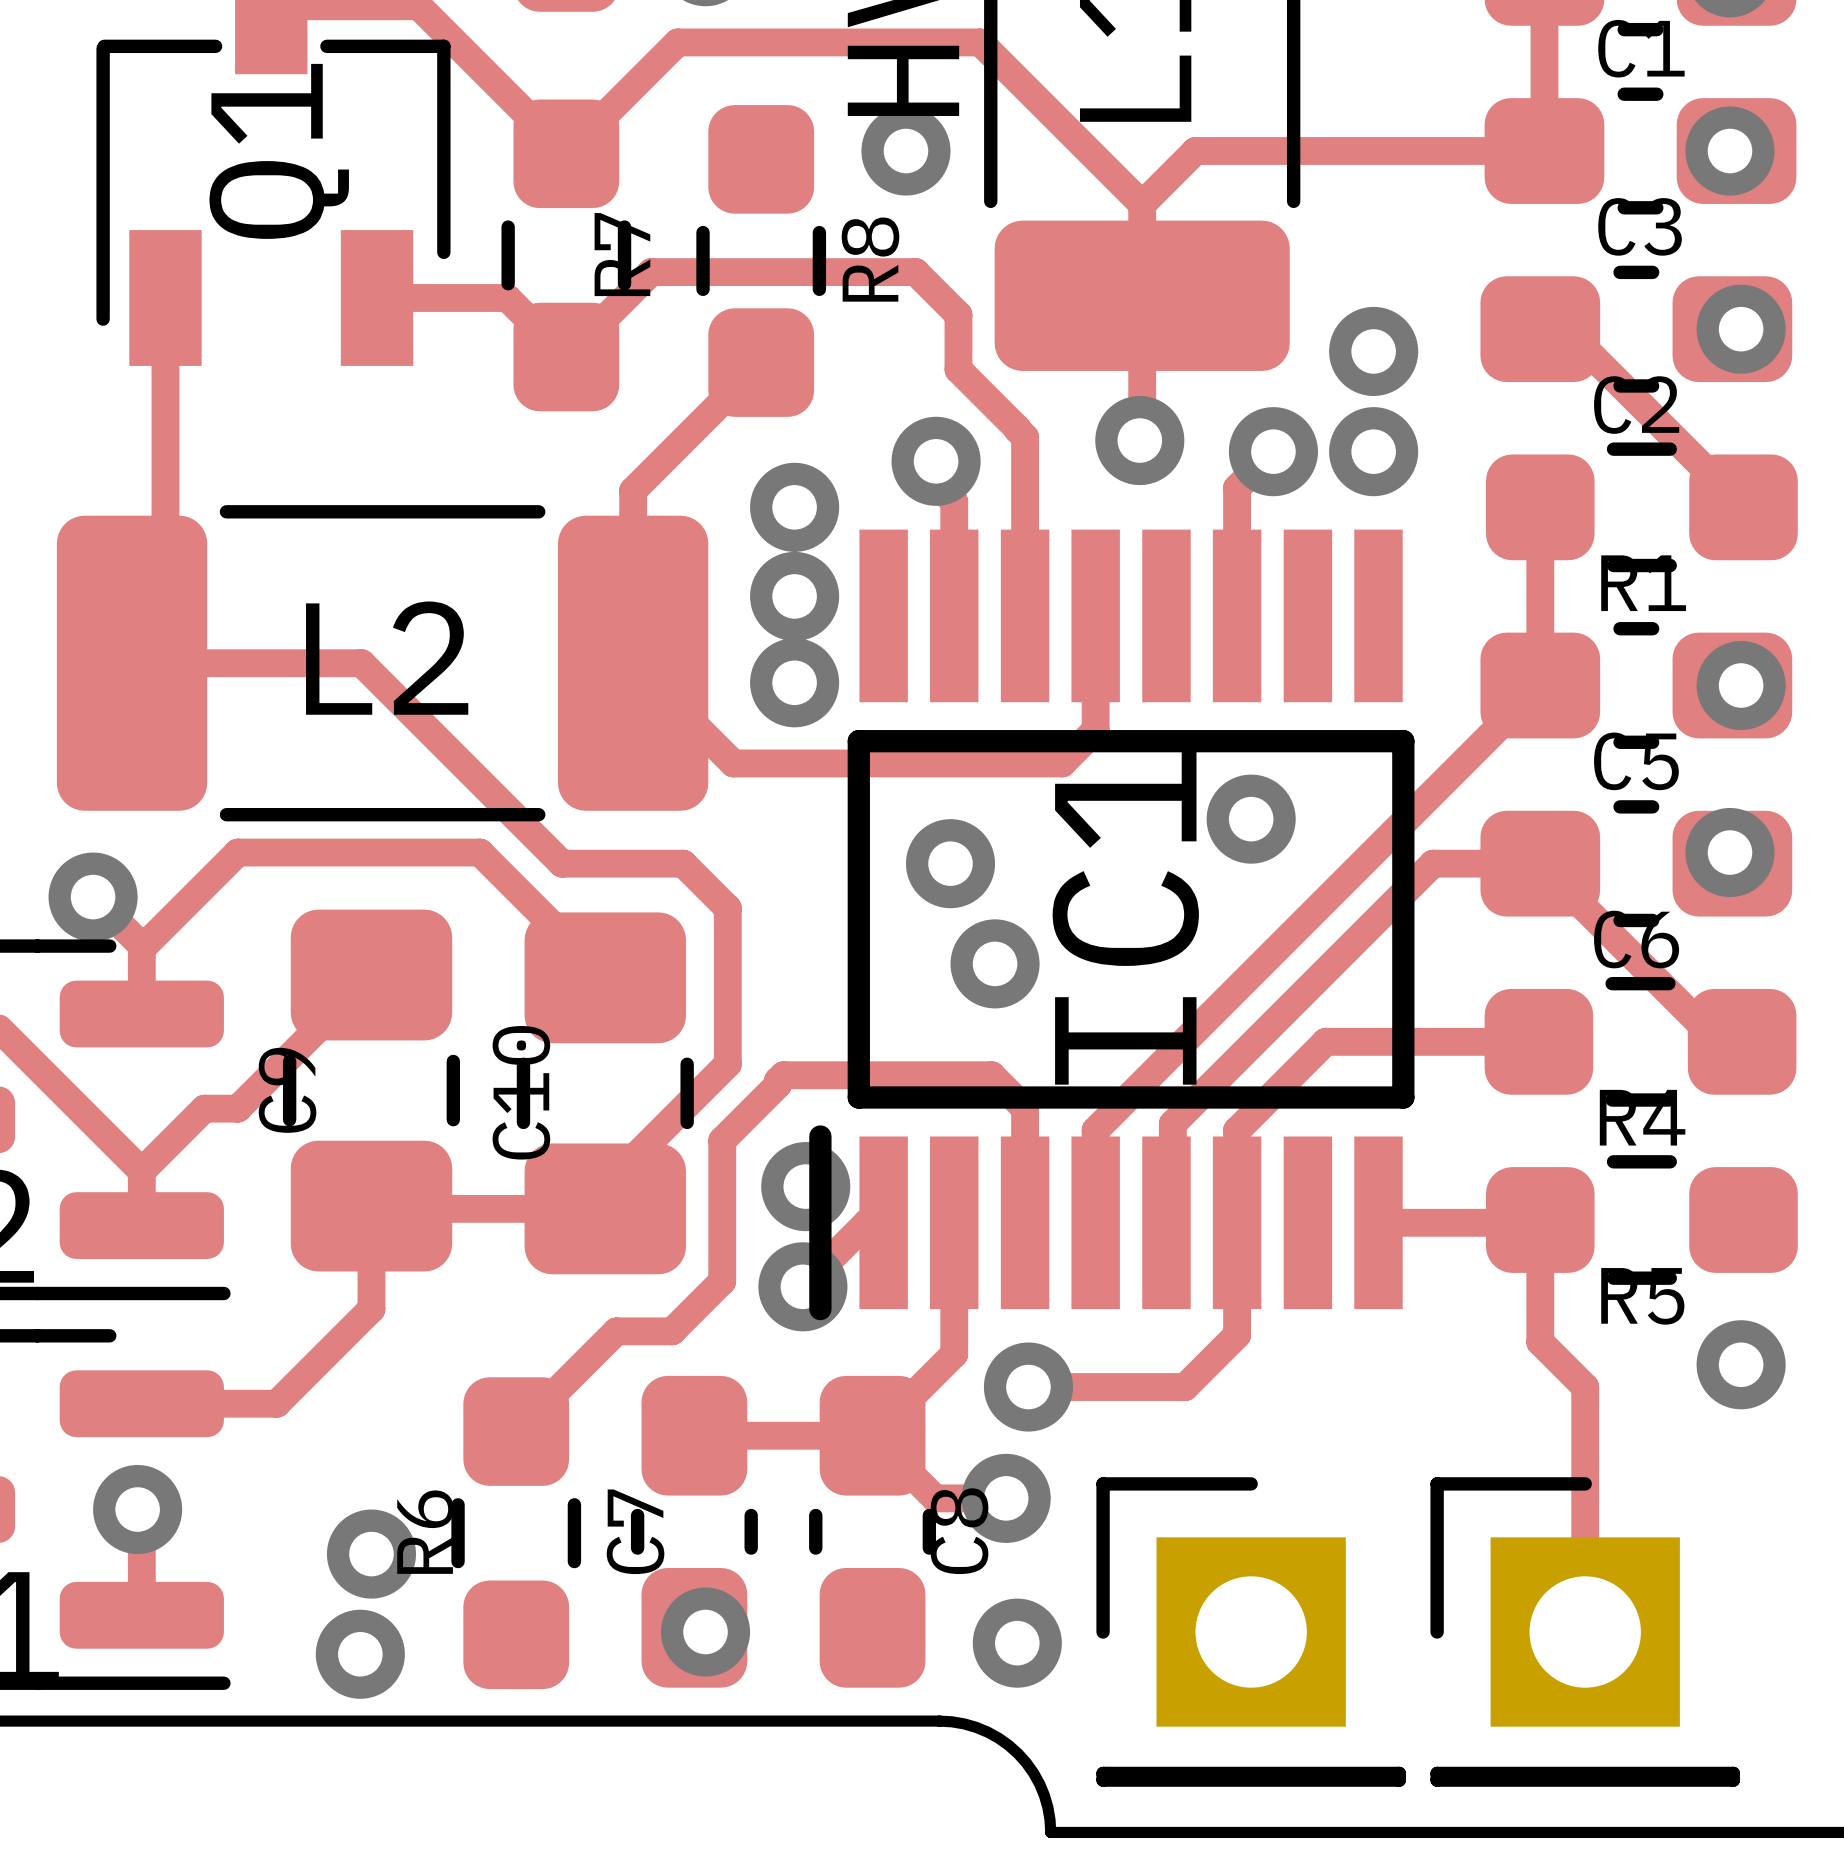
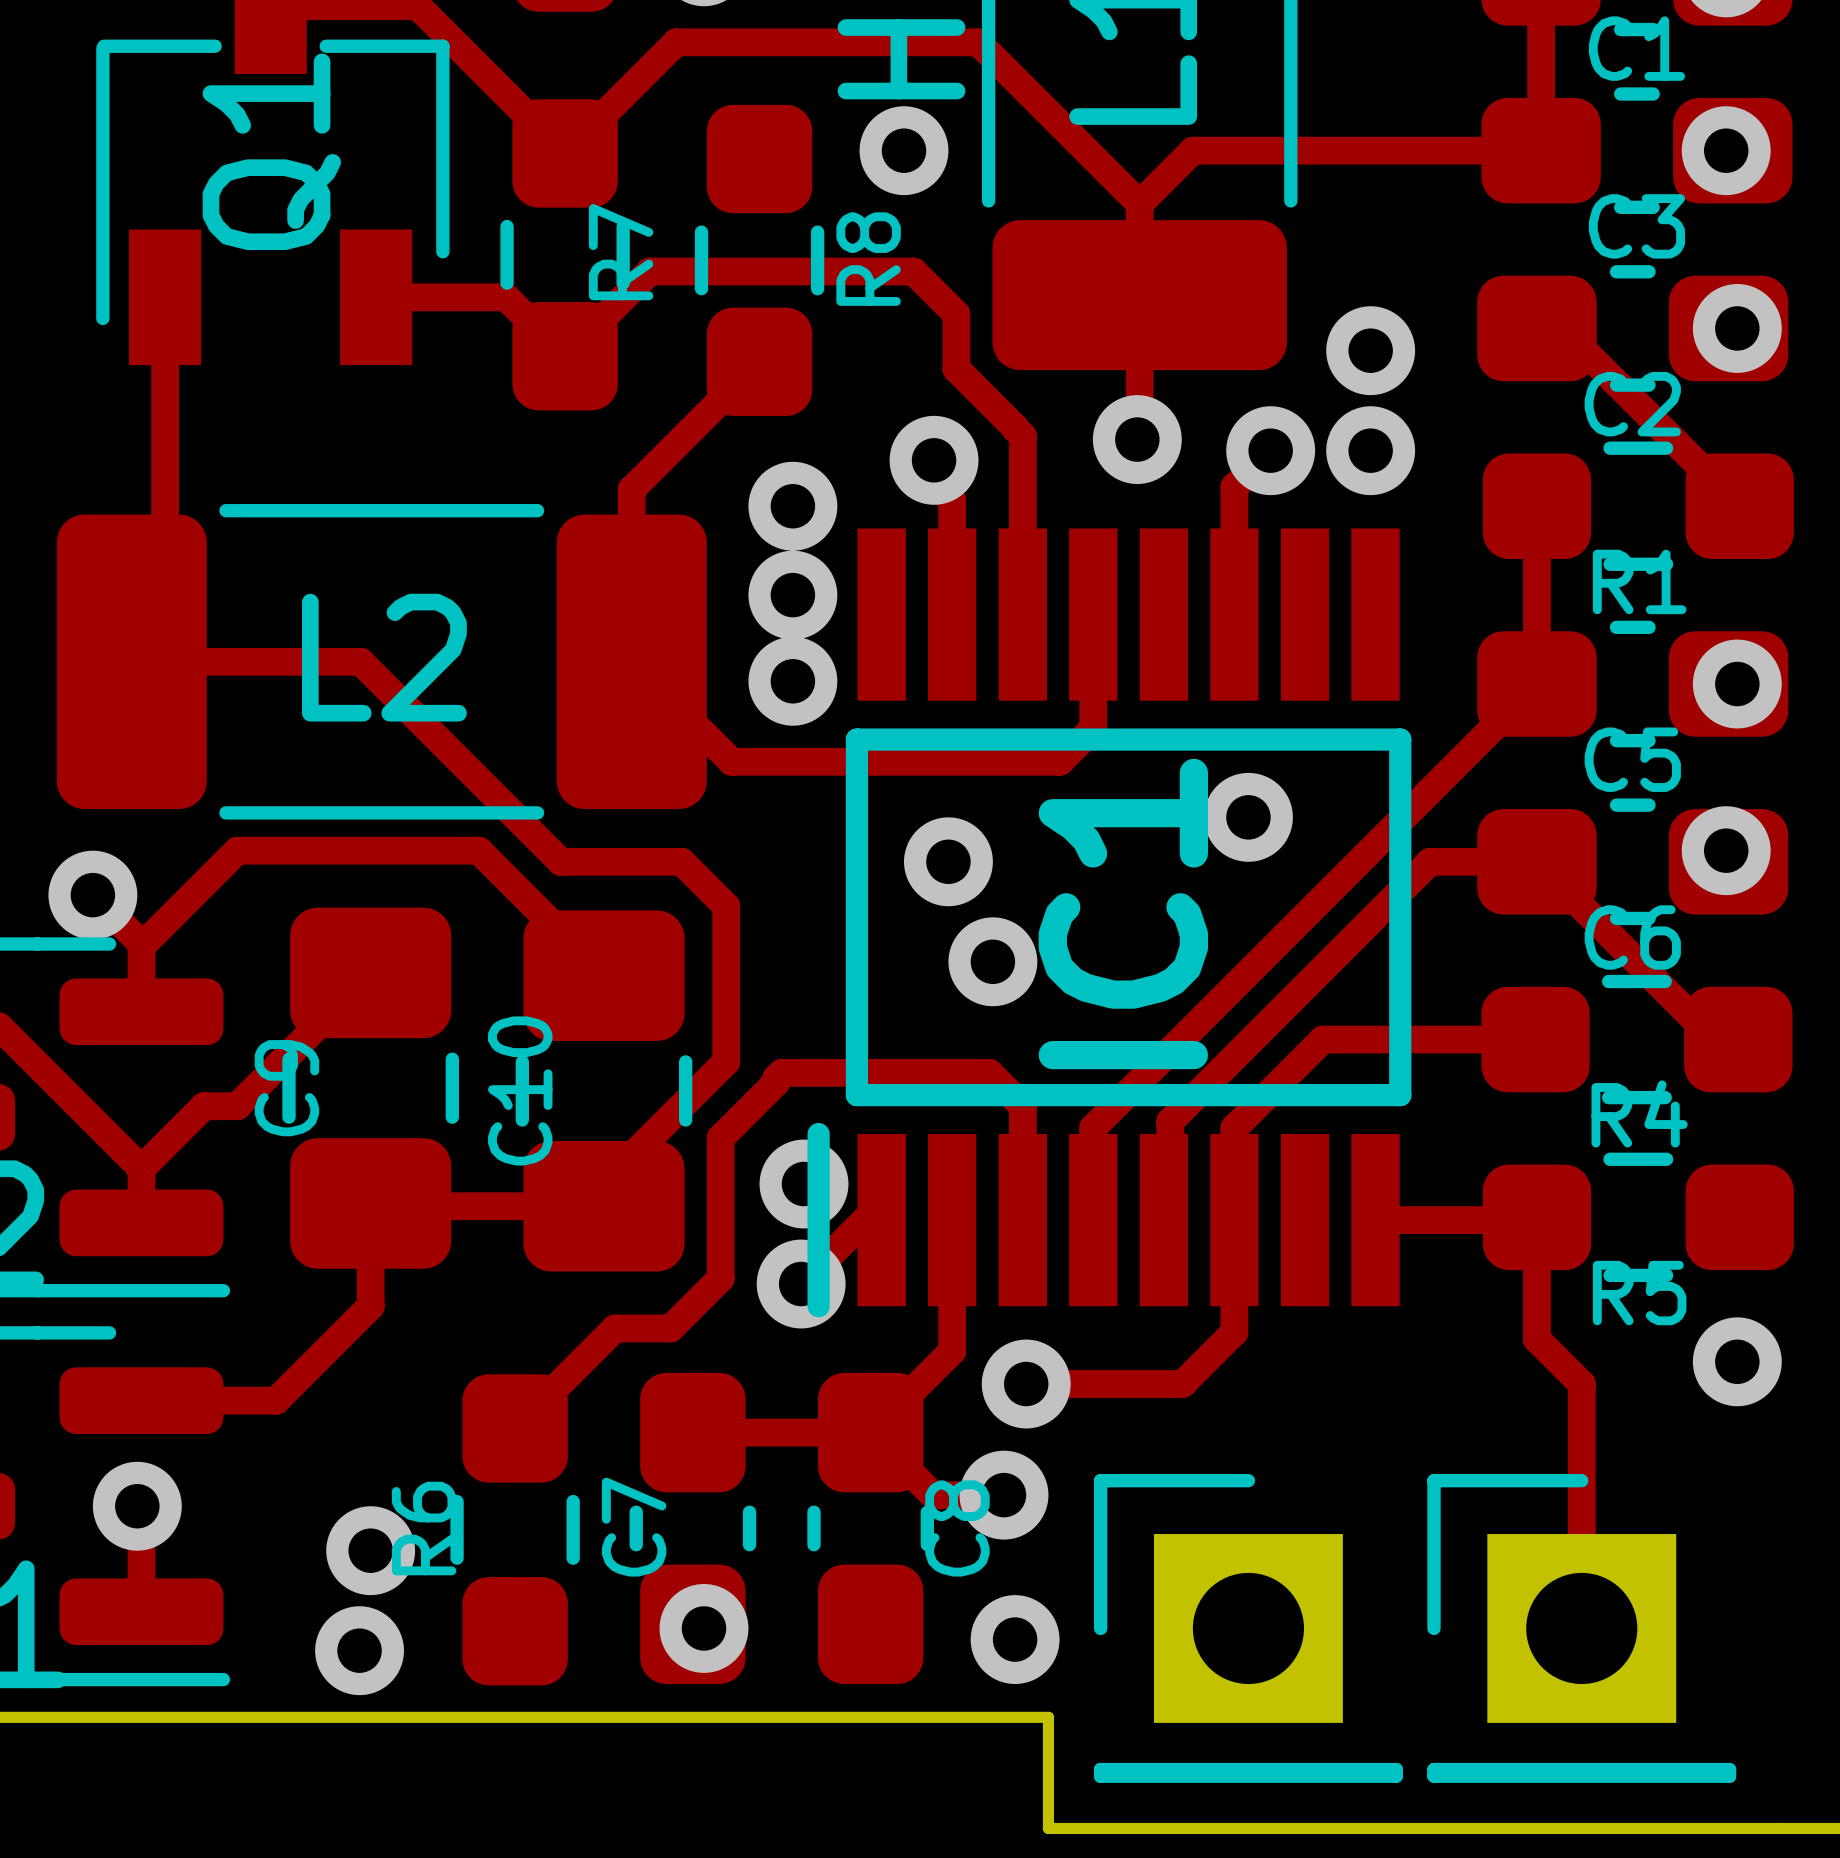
board edge: (939, 1721) (976, 1727) (998, 1738) (1018, 1753) (1033, 1773) (1044, 1795) (1050, 1832) -> (937, 1717) (1048, 1717) (1048, 1828)

